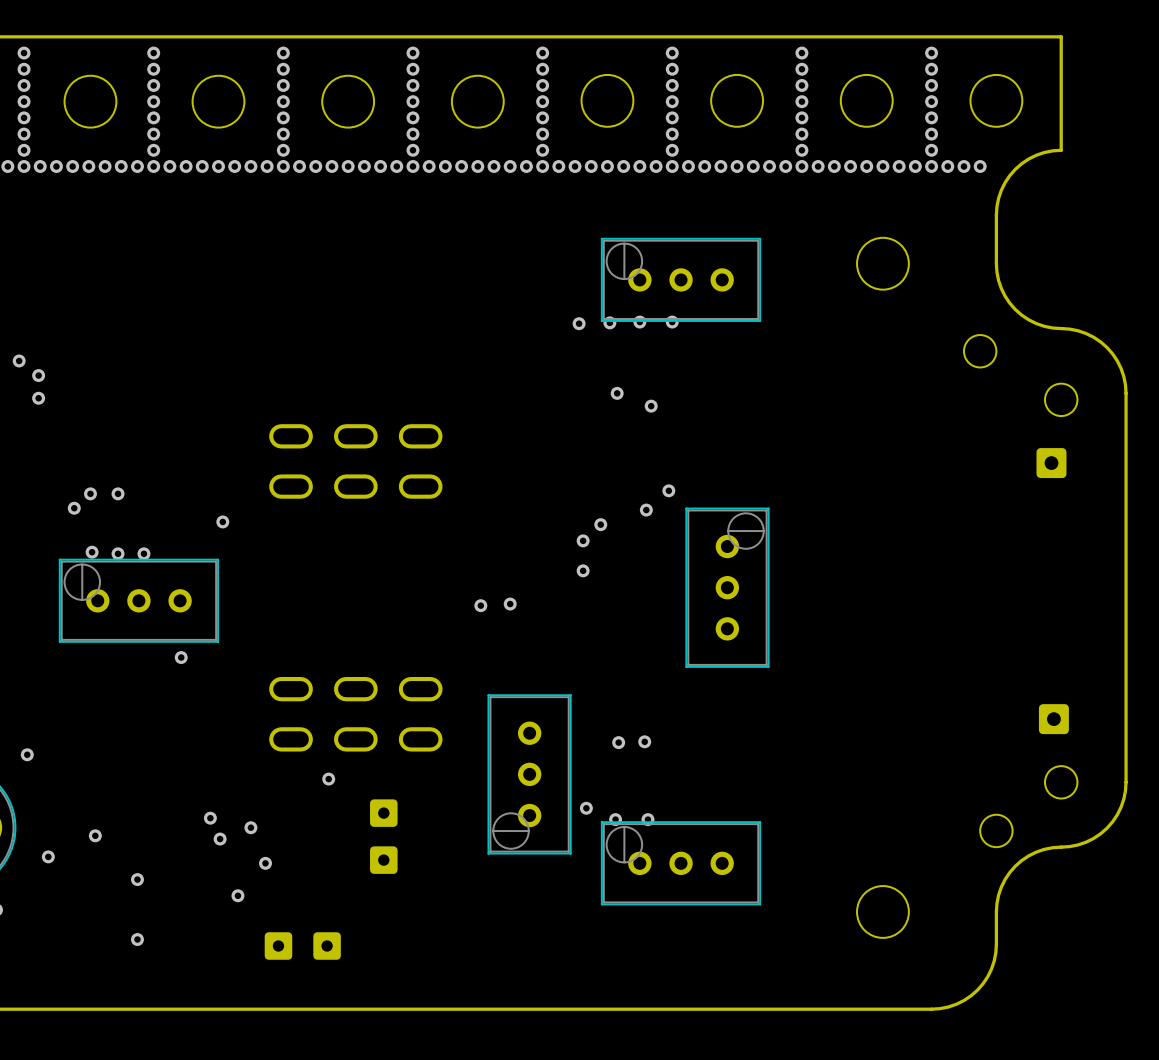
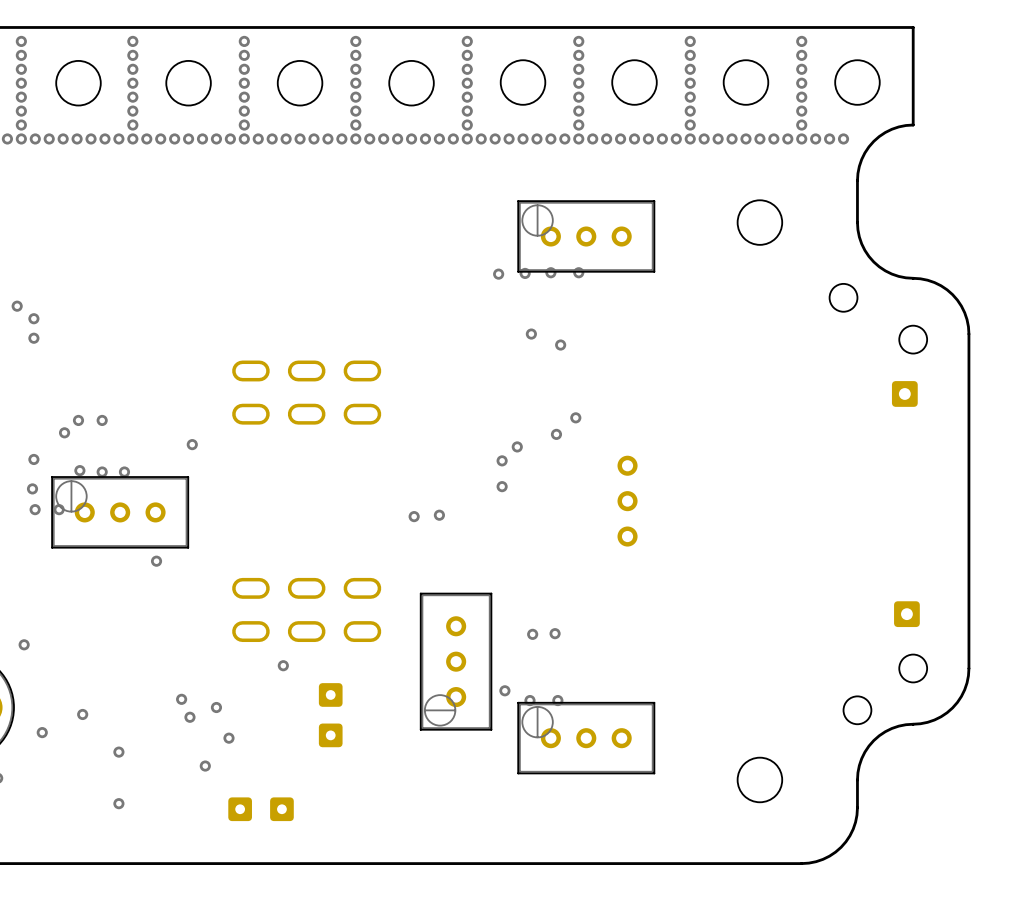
via: none -> (33, 459)
via: none -> (32, 488)
part side: bottom (727, 587) -> top (627, 501)
via: none -> (35, 509)
via: none -> (59, 509)

